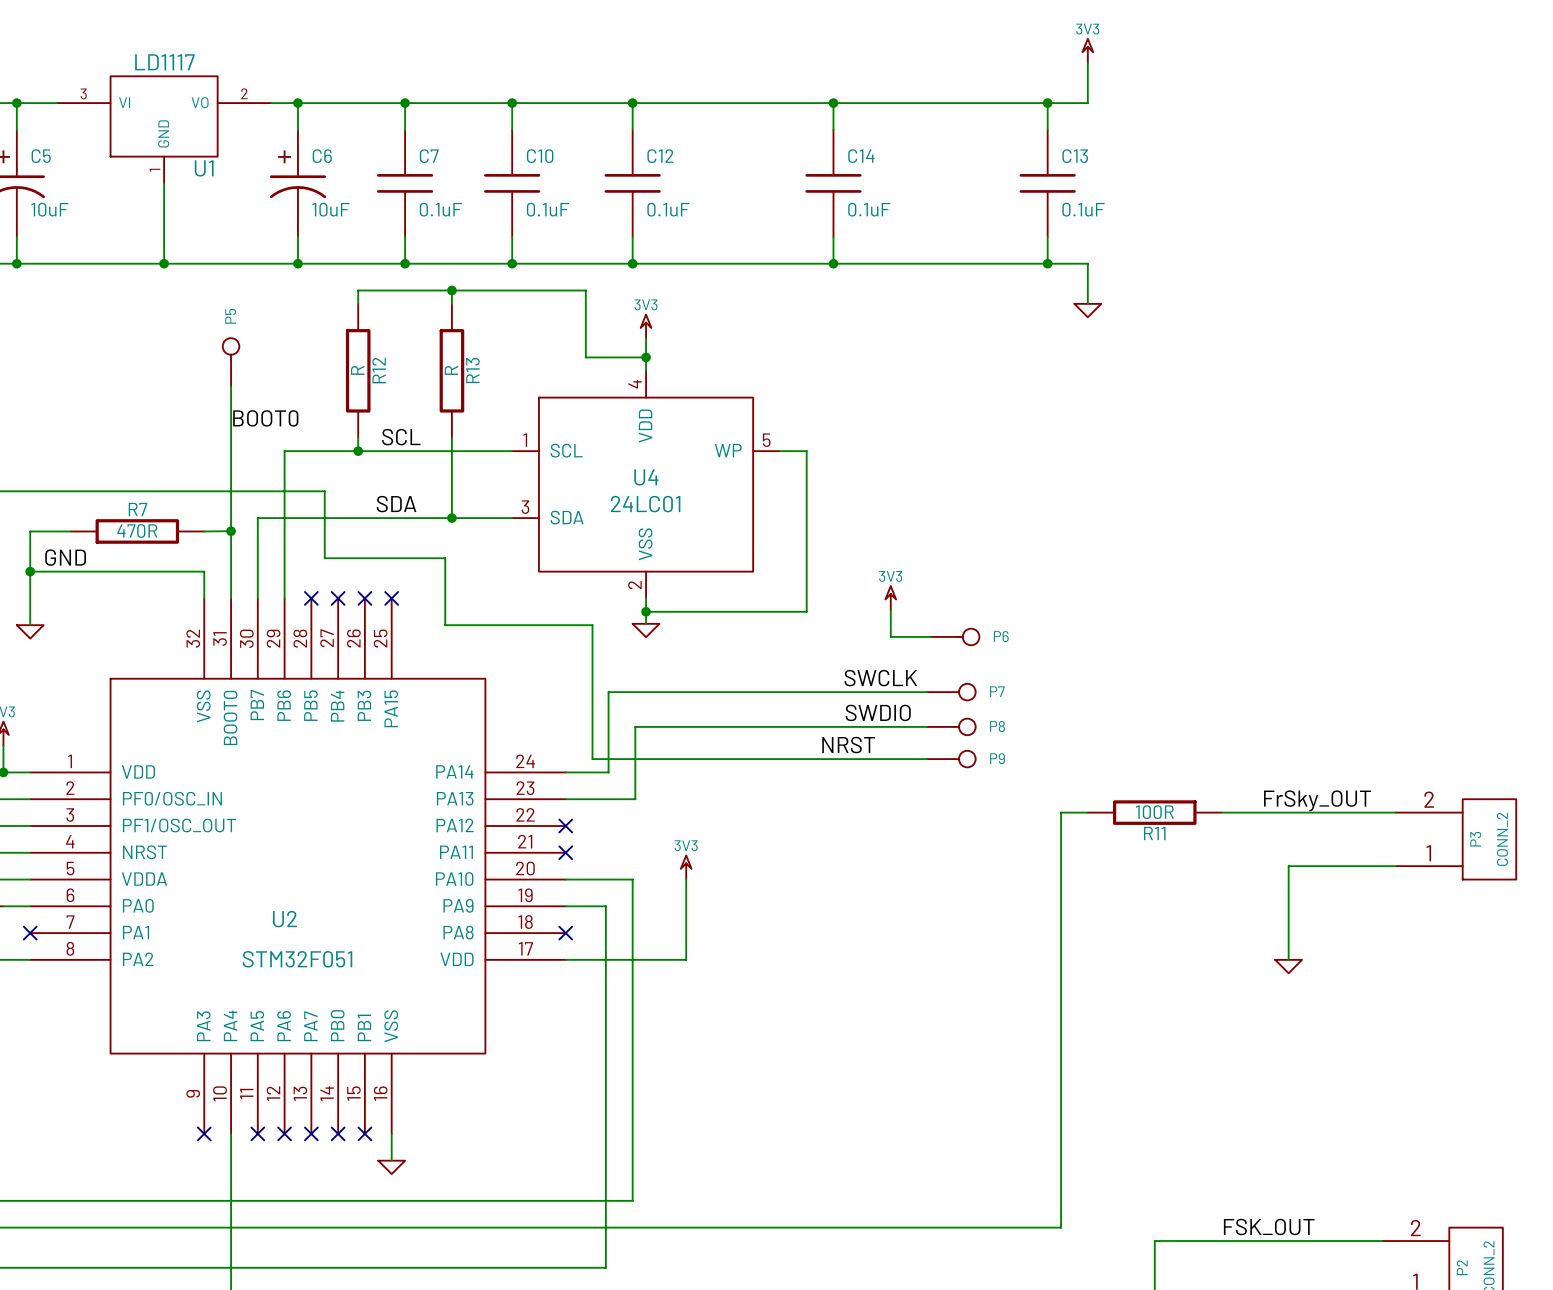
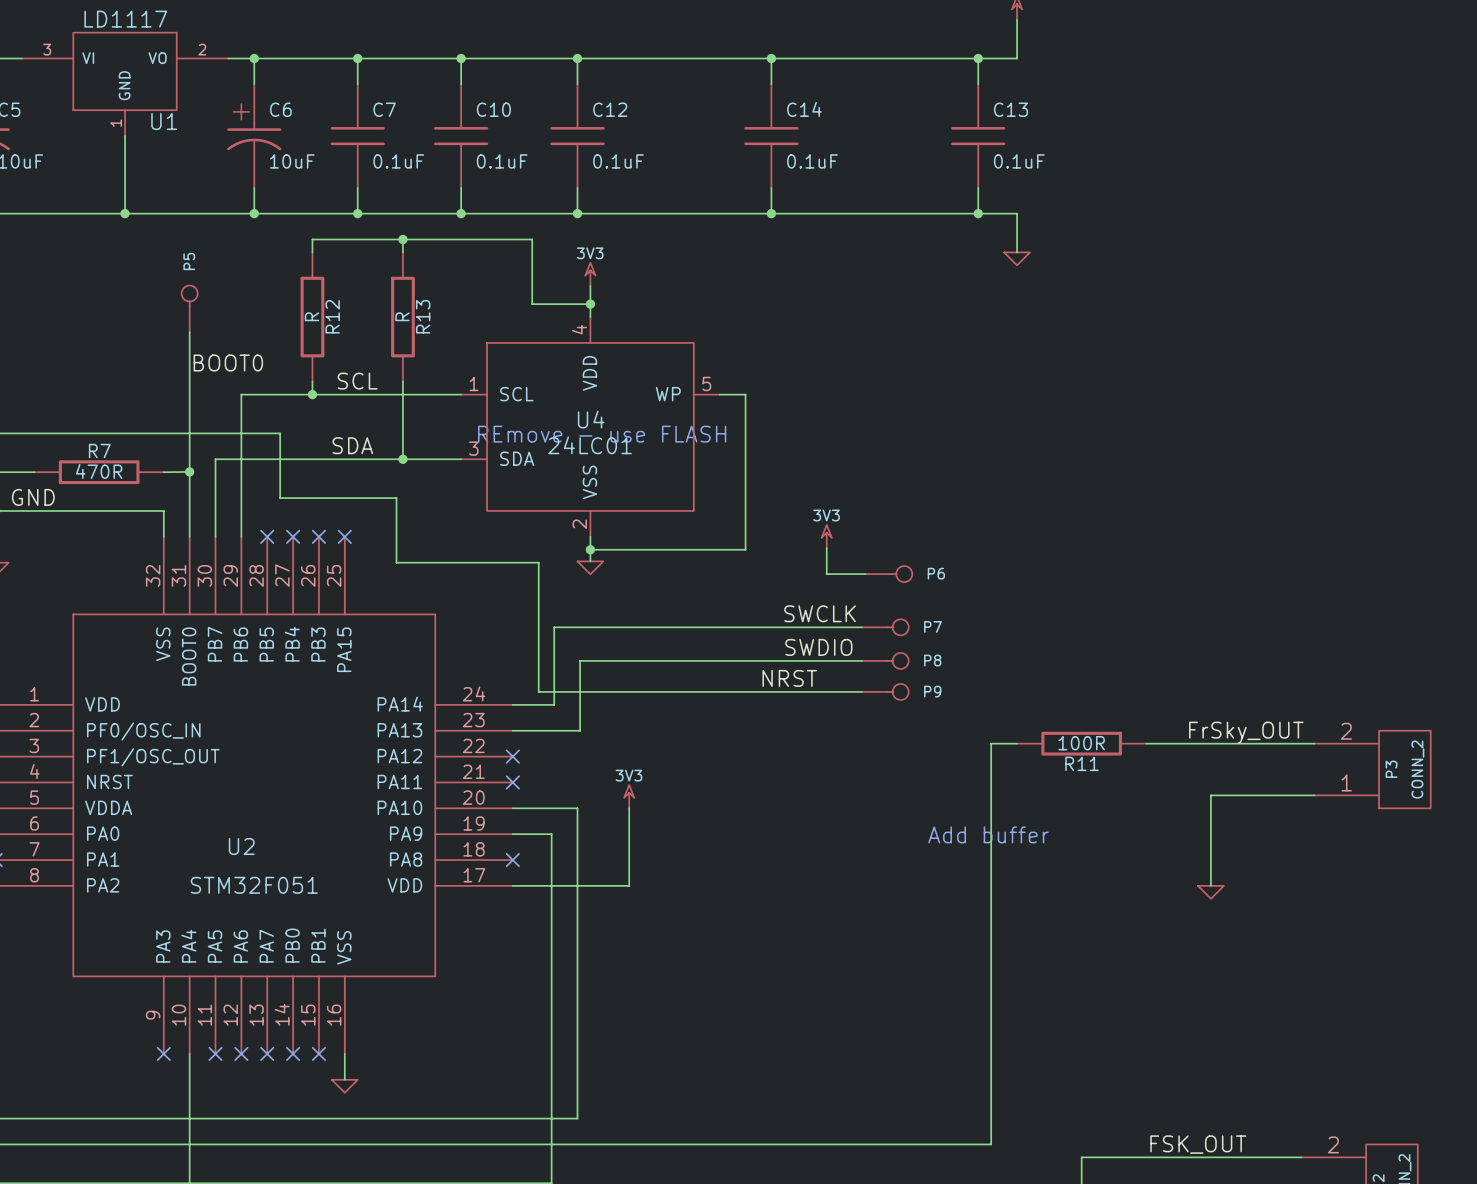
text: none -> REmove - use FLASH (602, 434)
text: none -> Add buffer (988, 834)

